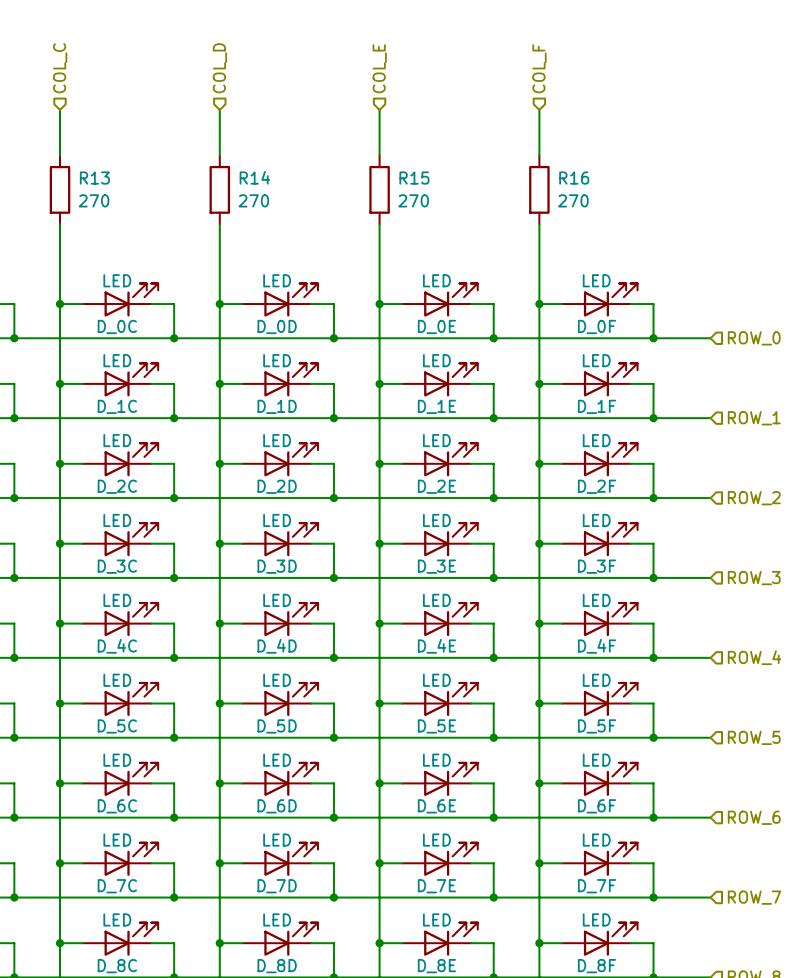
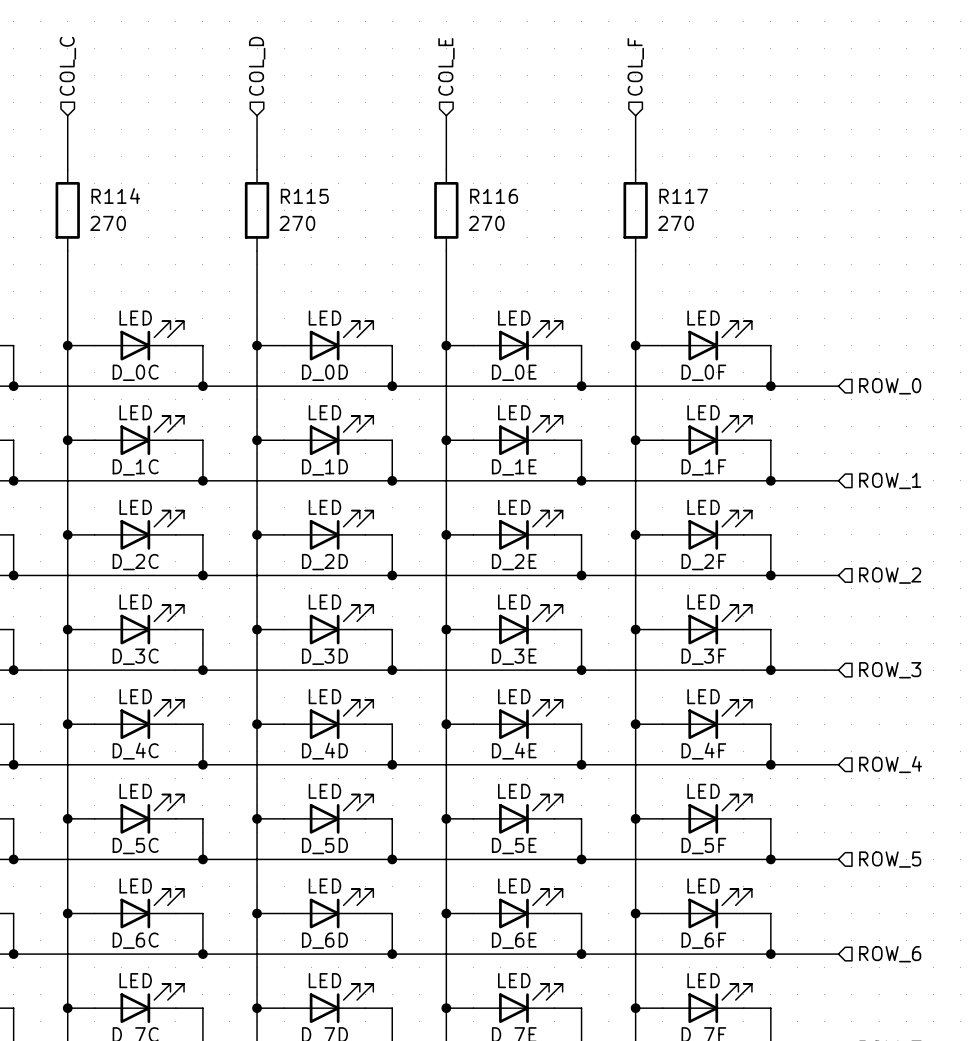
R14 name: R14 (254, 177) -> R115 (304, 196)
R13 name: R13 (94, 178) -> R114 (115, 196)
R15 name: R15 (414, 178) -> R116 (494, 196)
R16 name: R16 (574, 178) -> R117 (683, 196)

